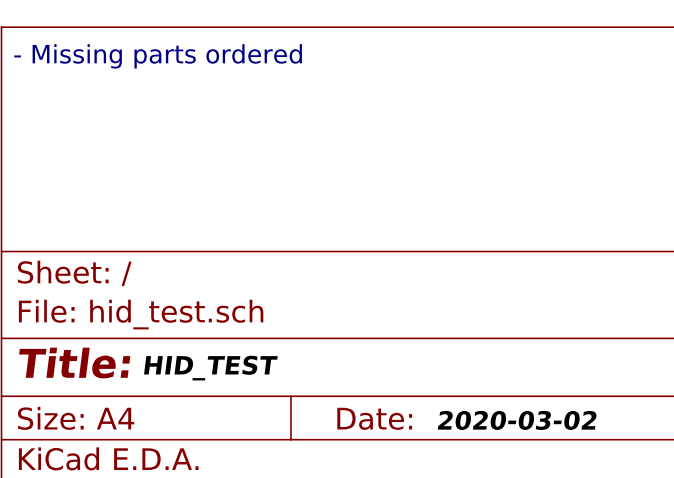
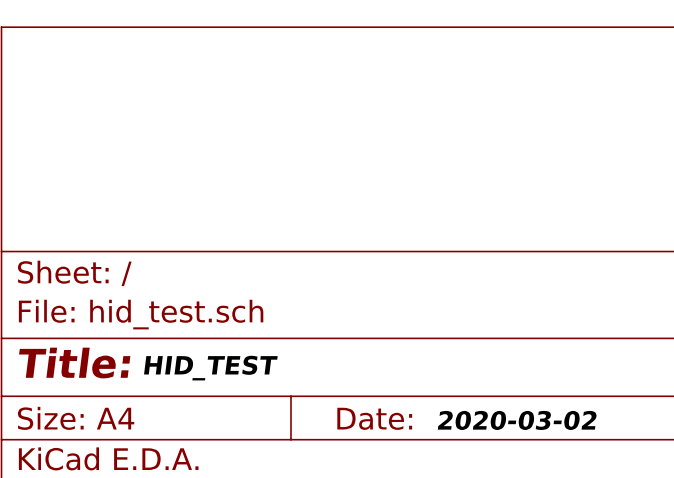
text: - Missing parts ordered (158, 56) -> none

